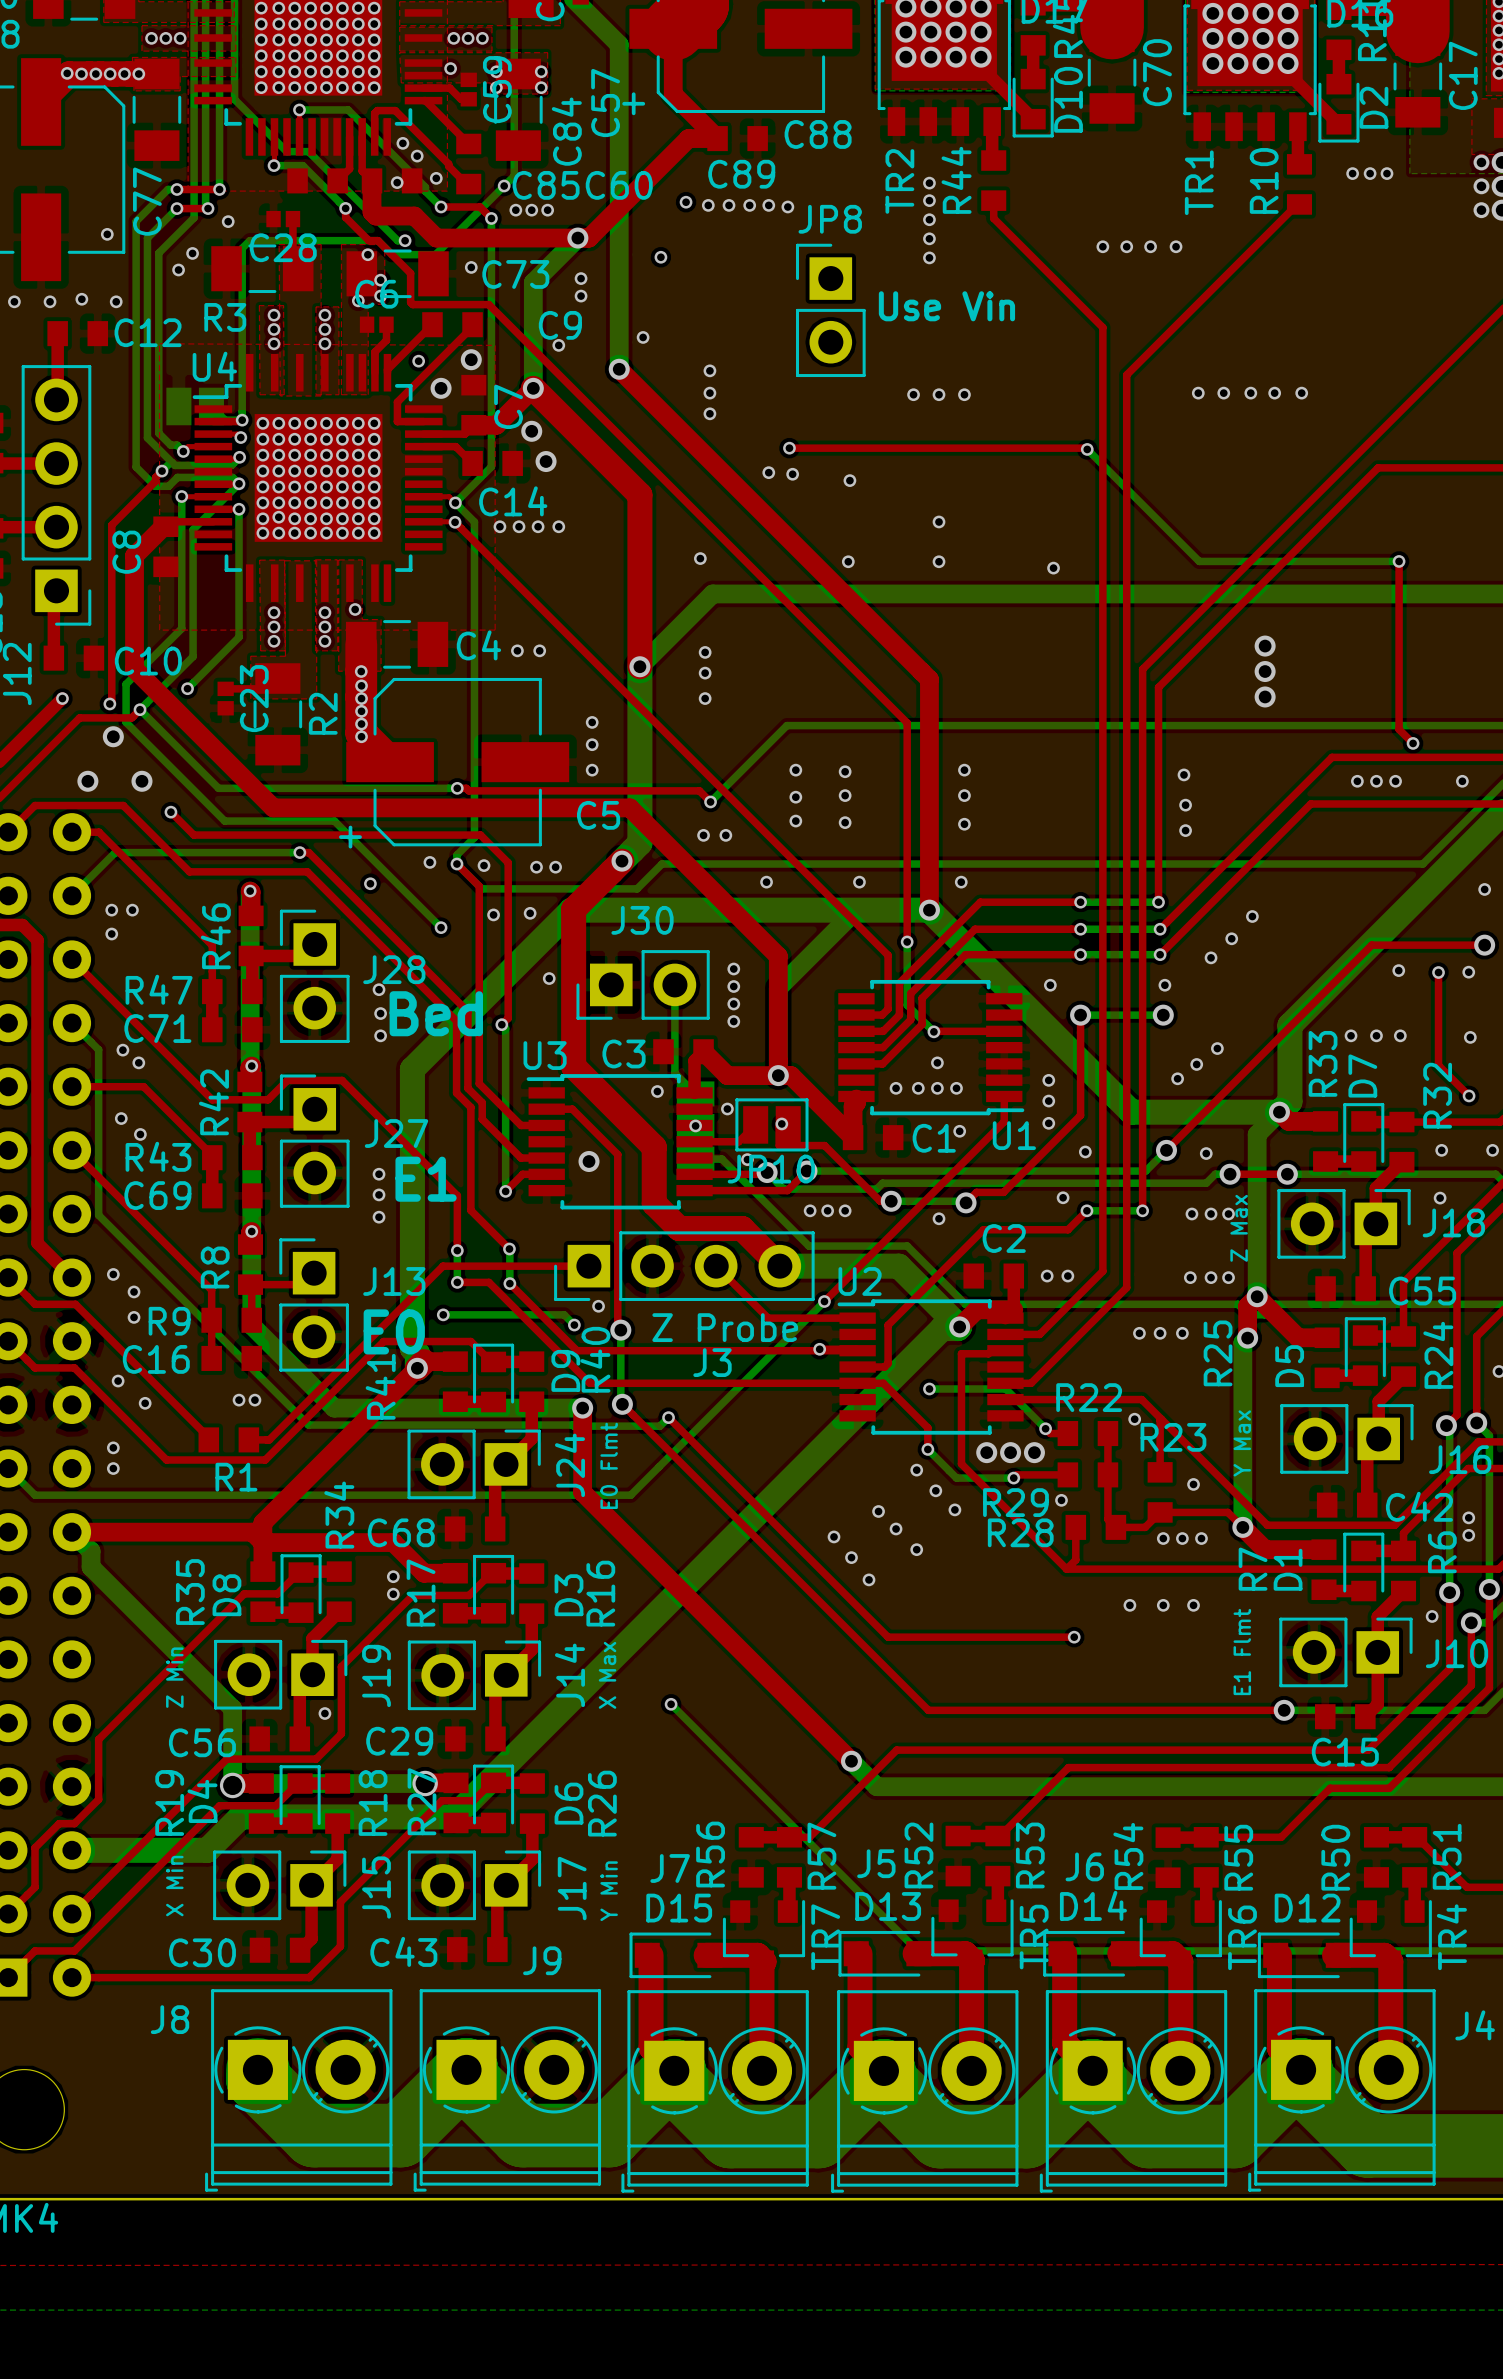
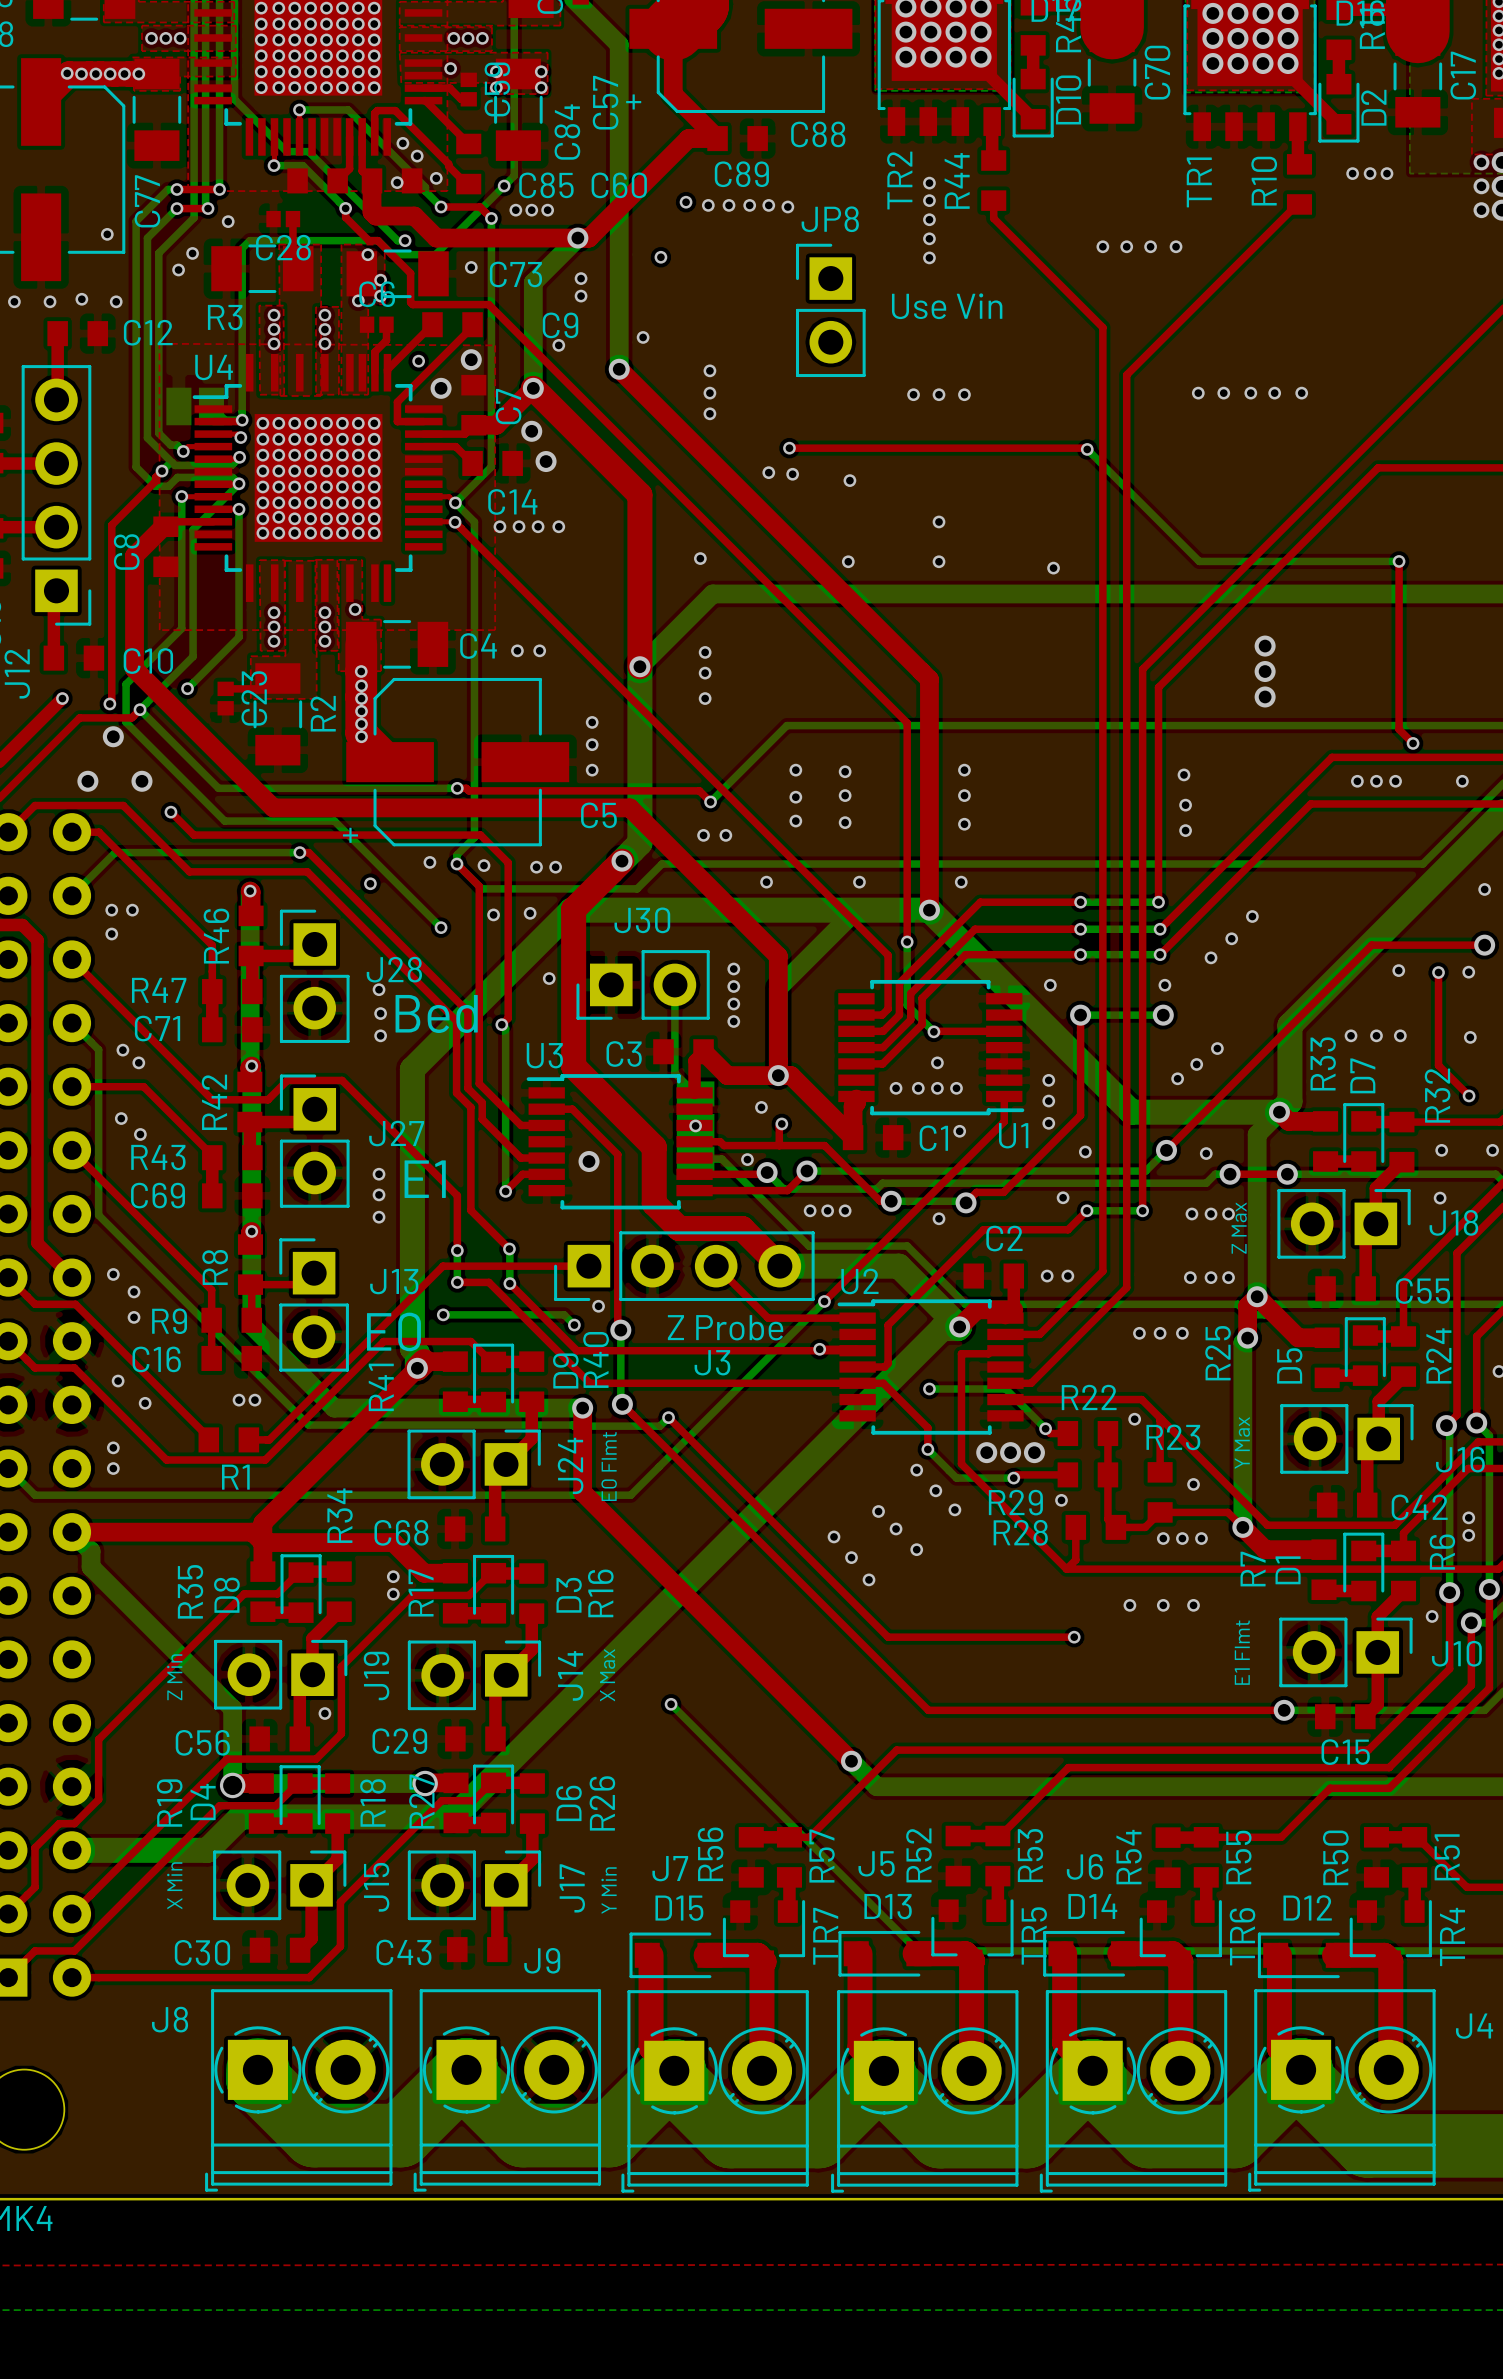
via: (657, 1091) -> none
via position: (727, 1109) -> (761, 1107)
top track: (755, 1124) (738, 1141) (720, 1141) -> (779, 1145) (724, 1145) (720, 1141)
JP10: (771, 1124) -> none

